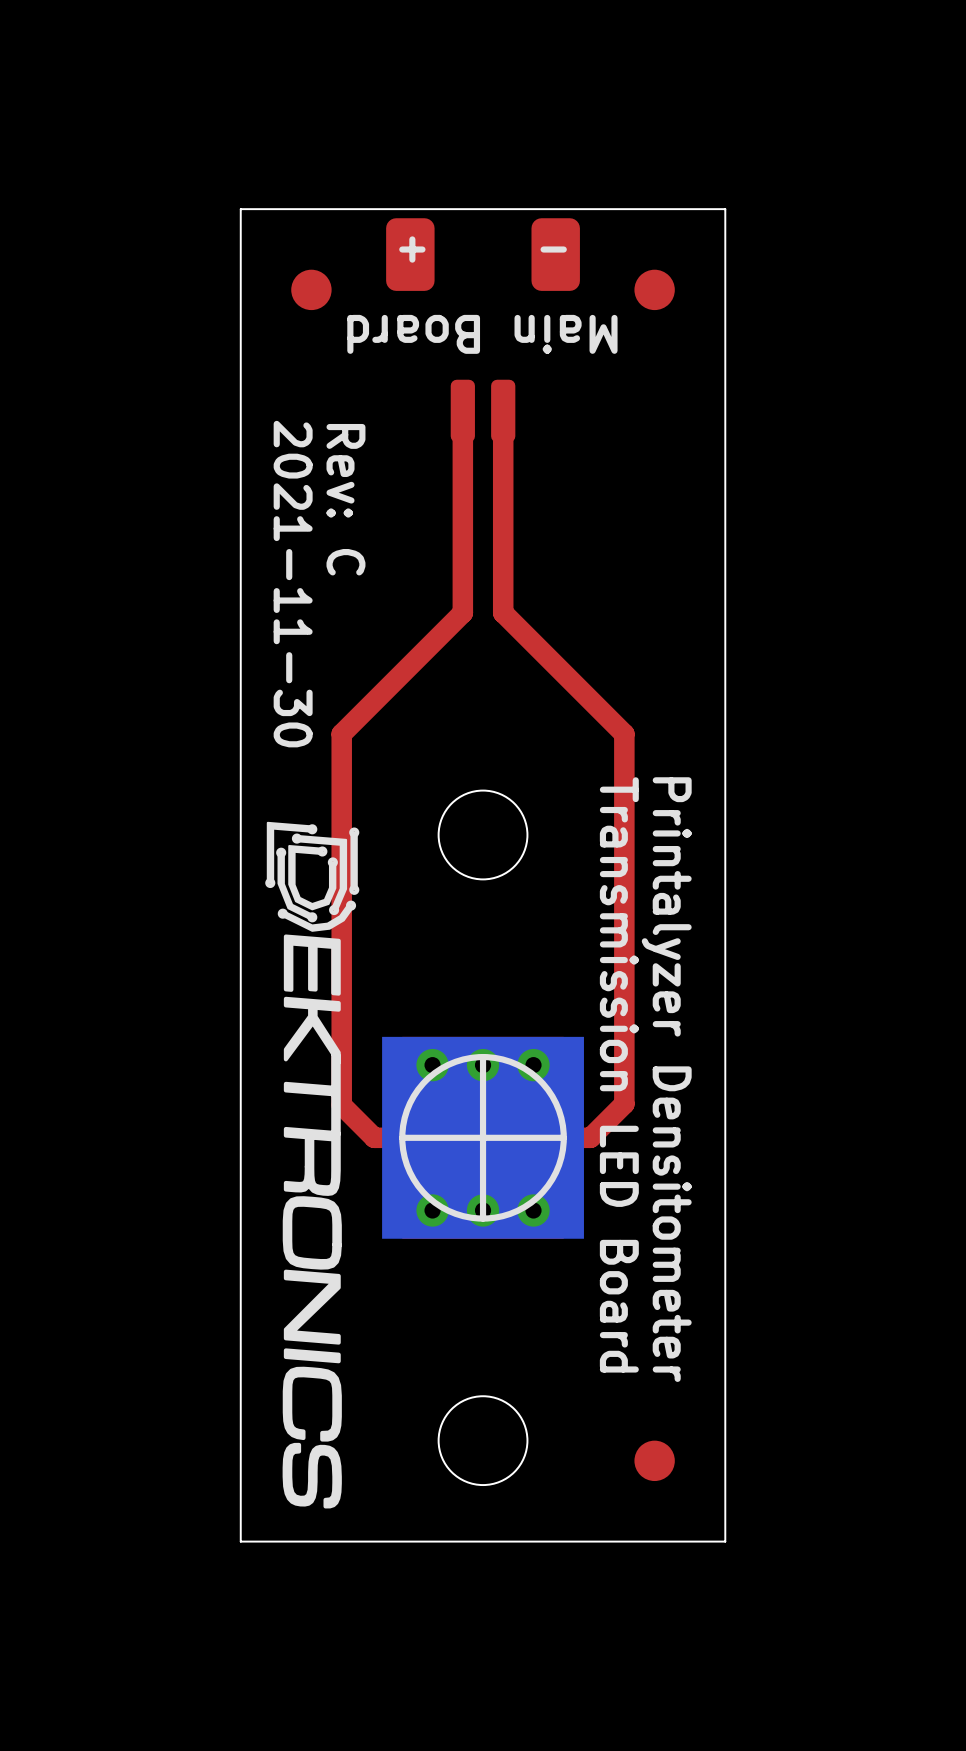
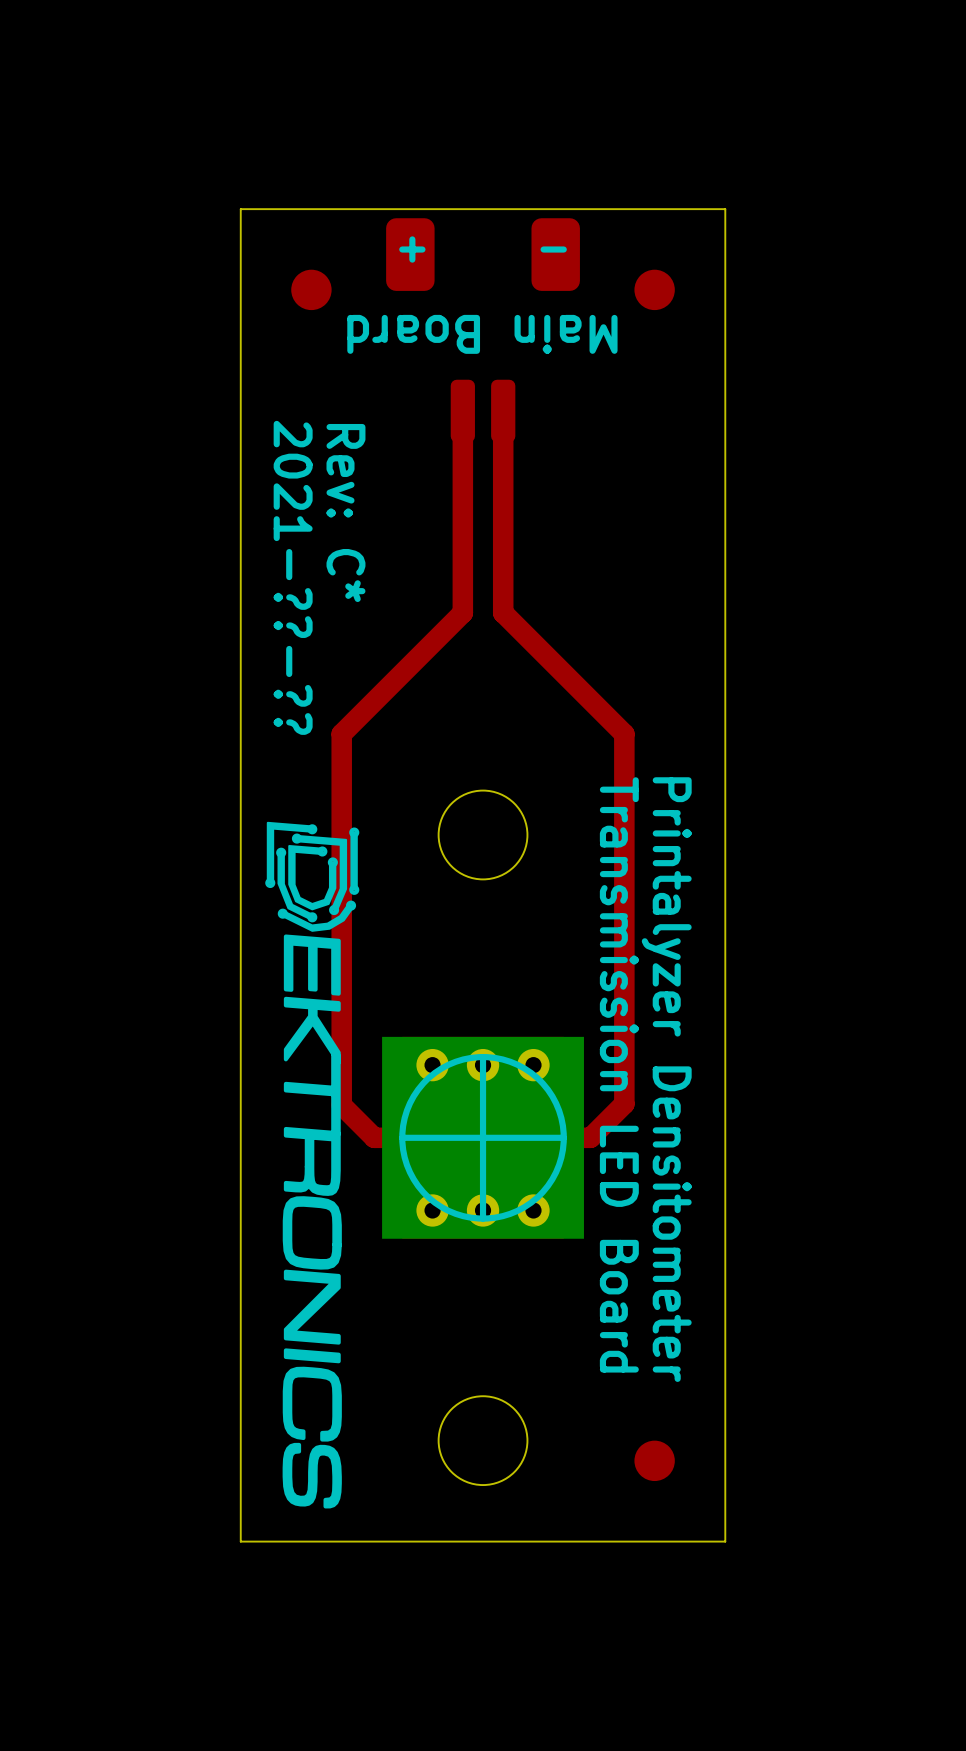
text: Rev: C (345, 499) -> Rev: C* (345, 513)
text: 2021-11-30 (293, 584) -> 2021-??-?? (293, 577)

